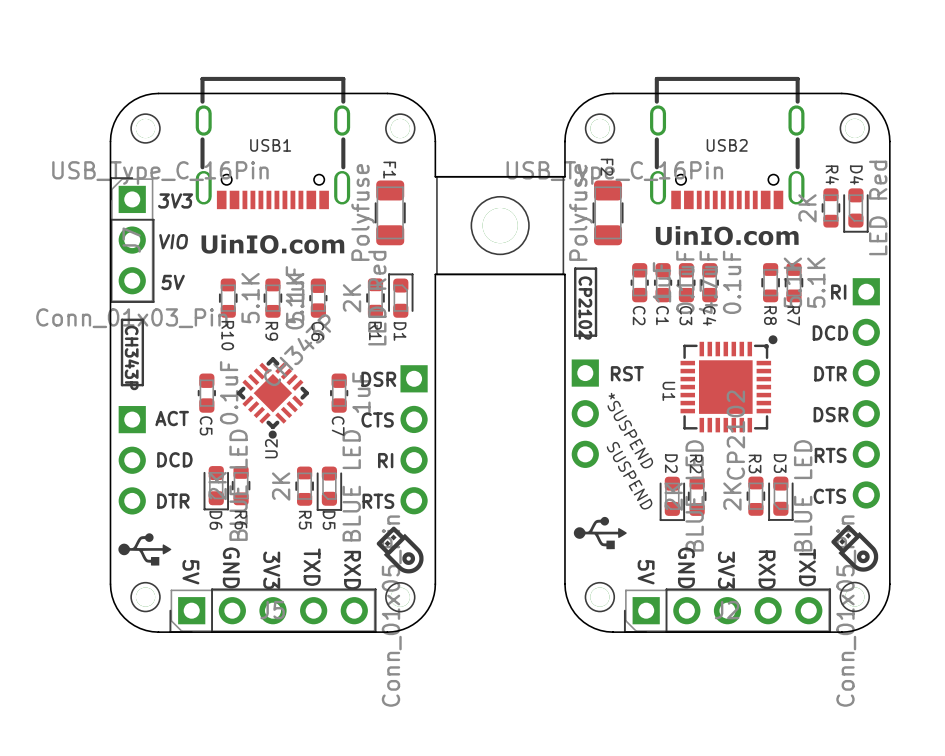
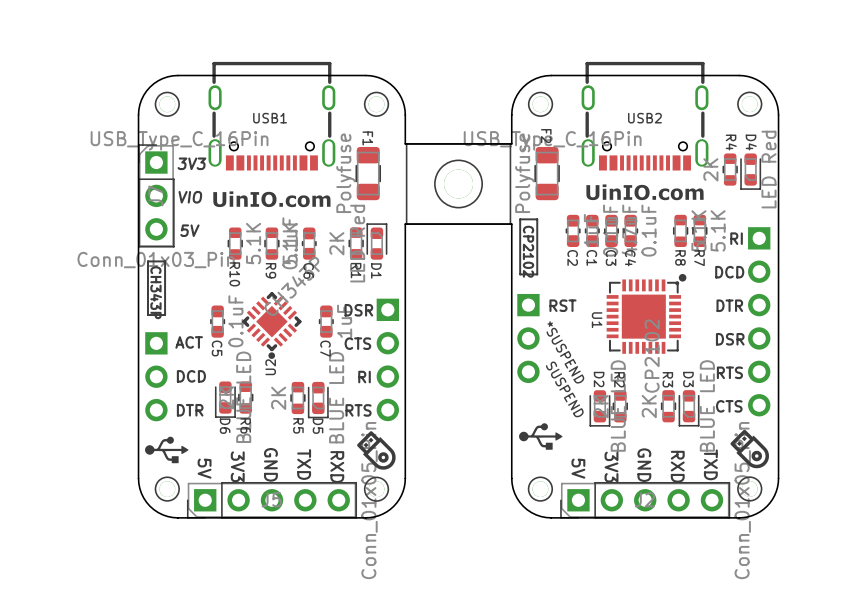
text: GND (231, 567) -> 3V3 (237, 466)
text: GND (686, 567) -> 3V3 (611, 467)
text: 3V3 (271, 570) -> GND (270, 464)
text: 3V3 (726, 570) -> GND (644, 465)

